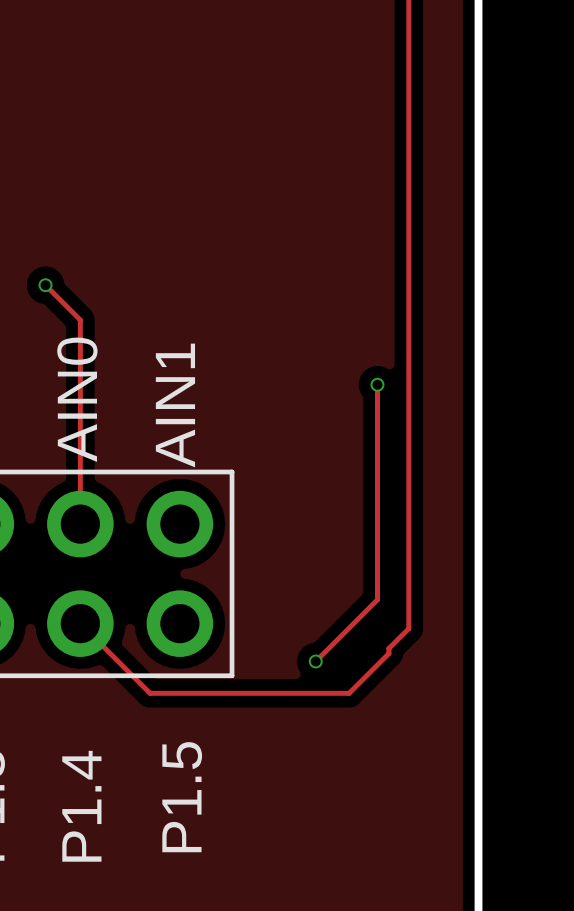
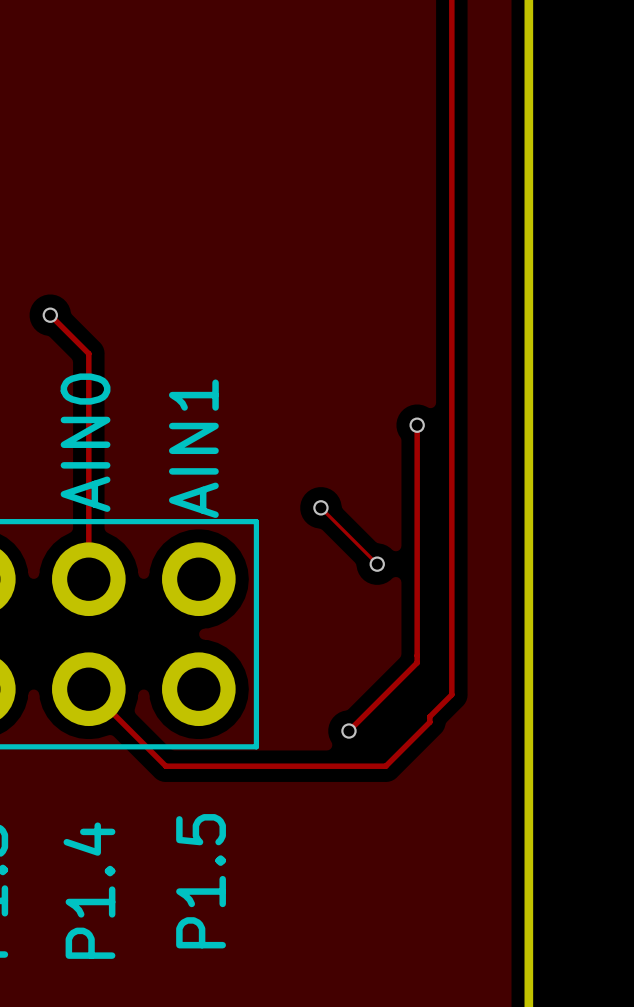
track: none -> (320, 507) (377, 564)
via: none -> (320, 507)
via: none -> (377, 564)

